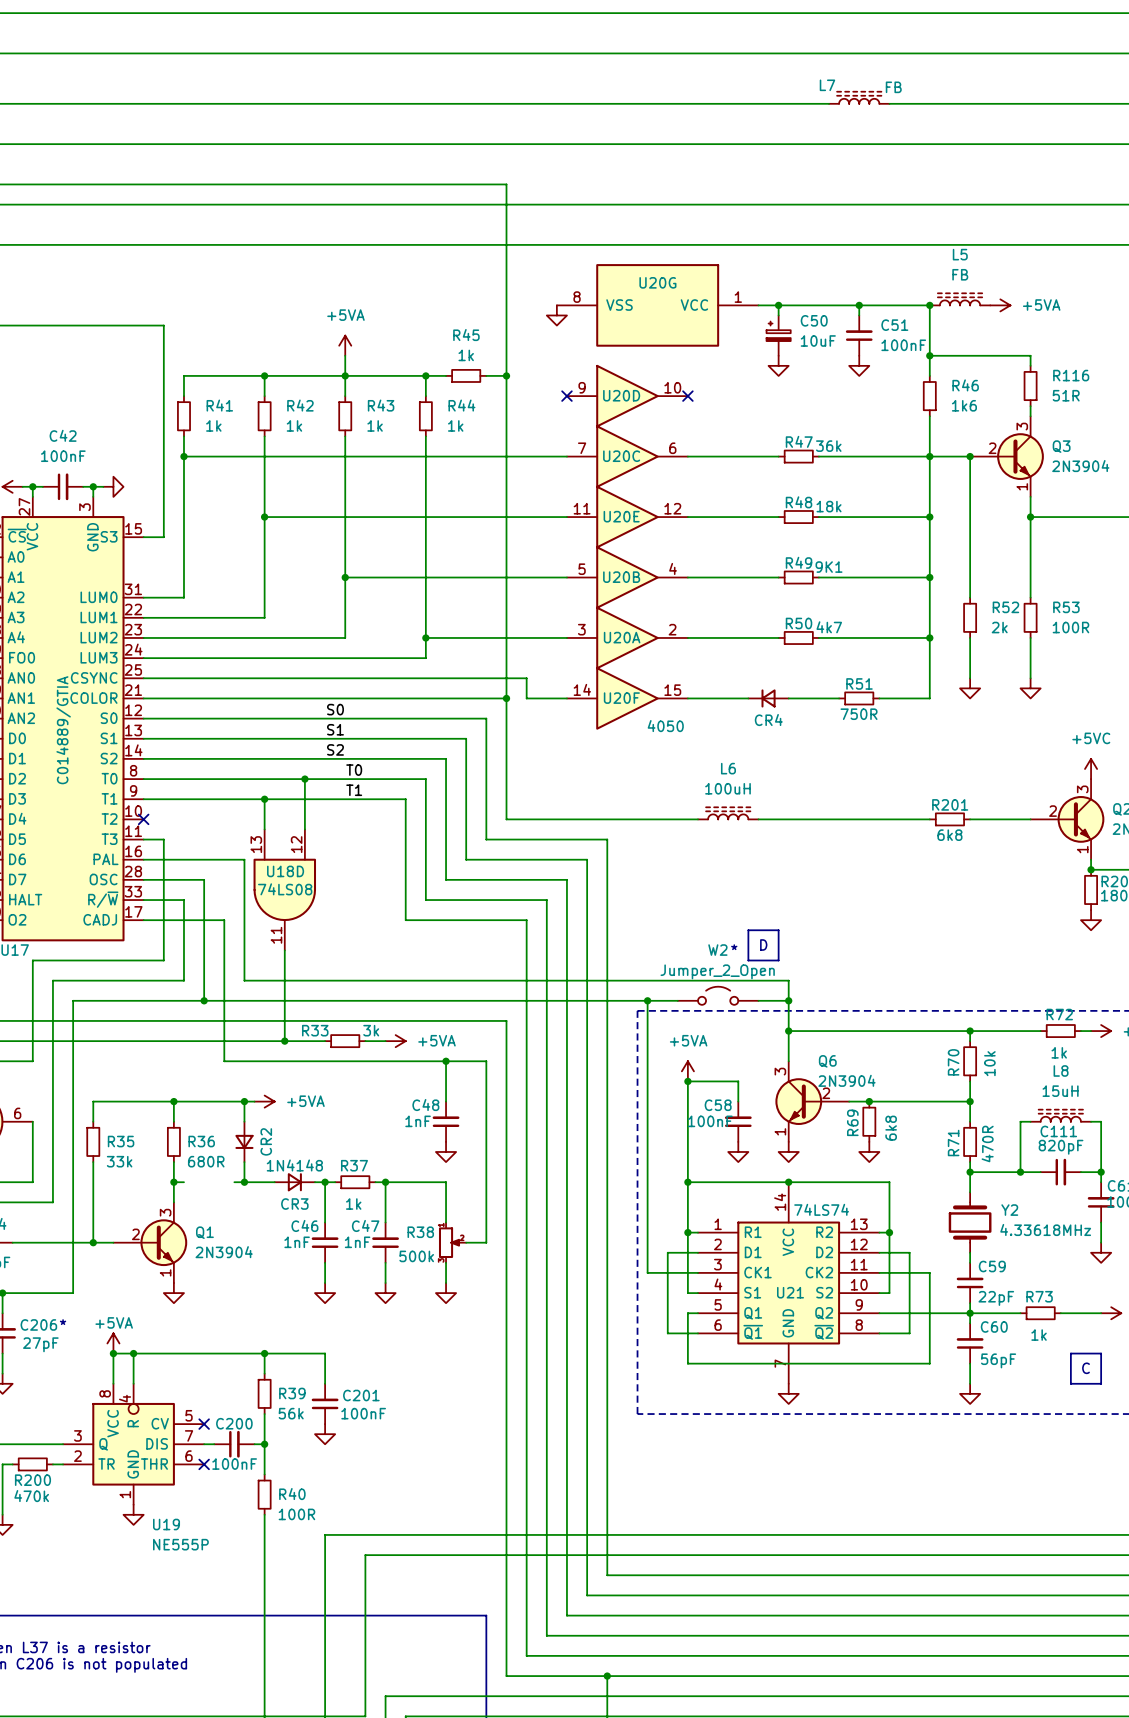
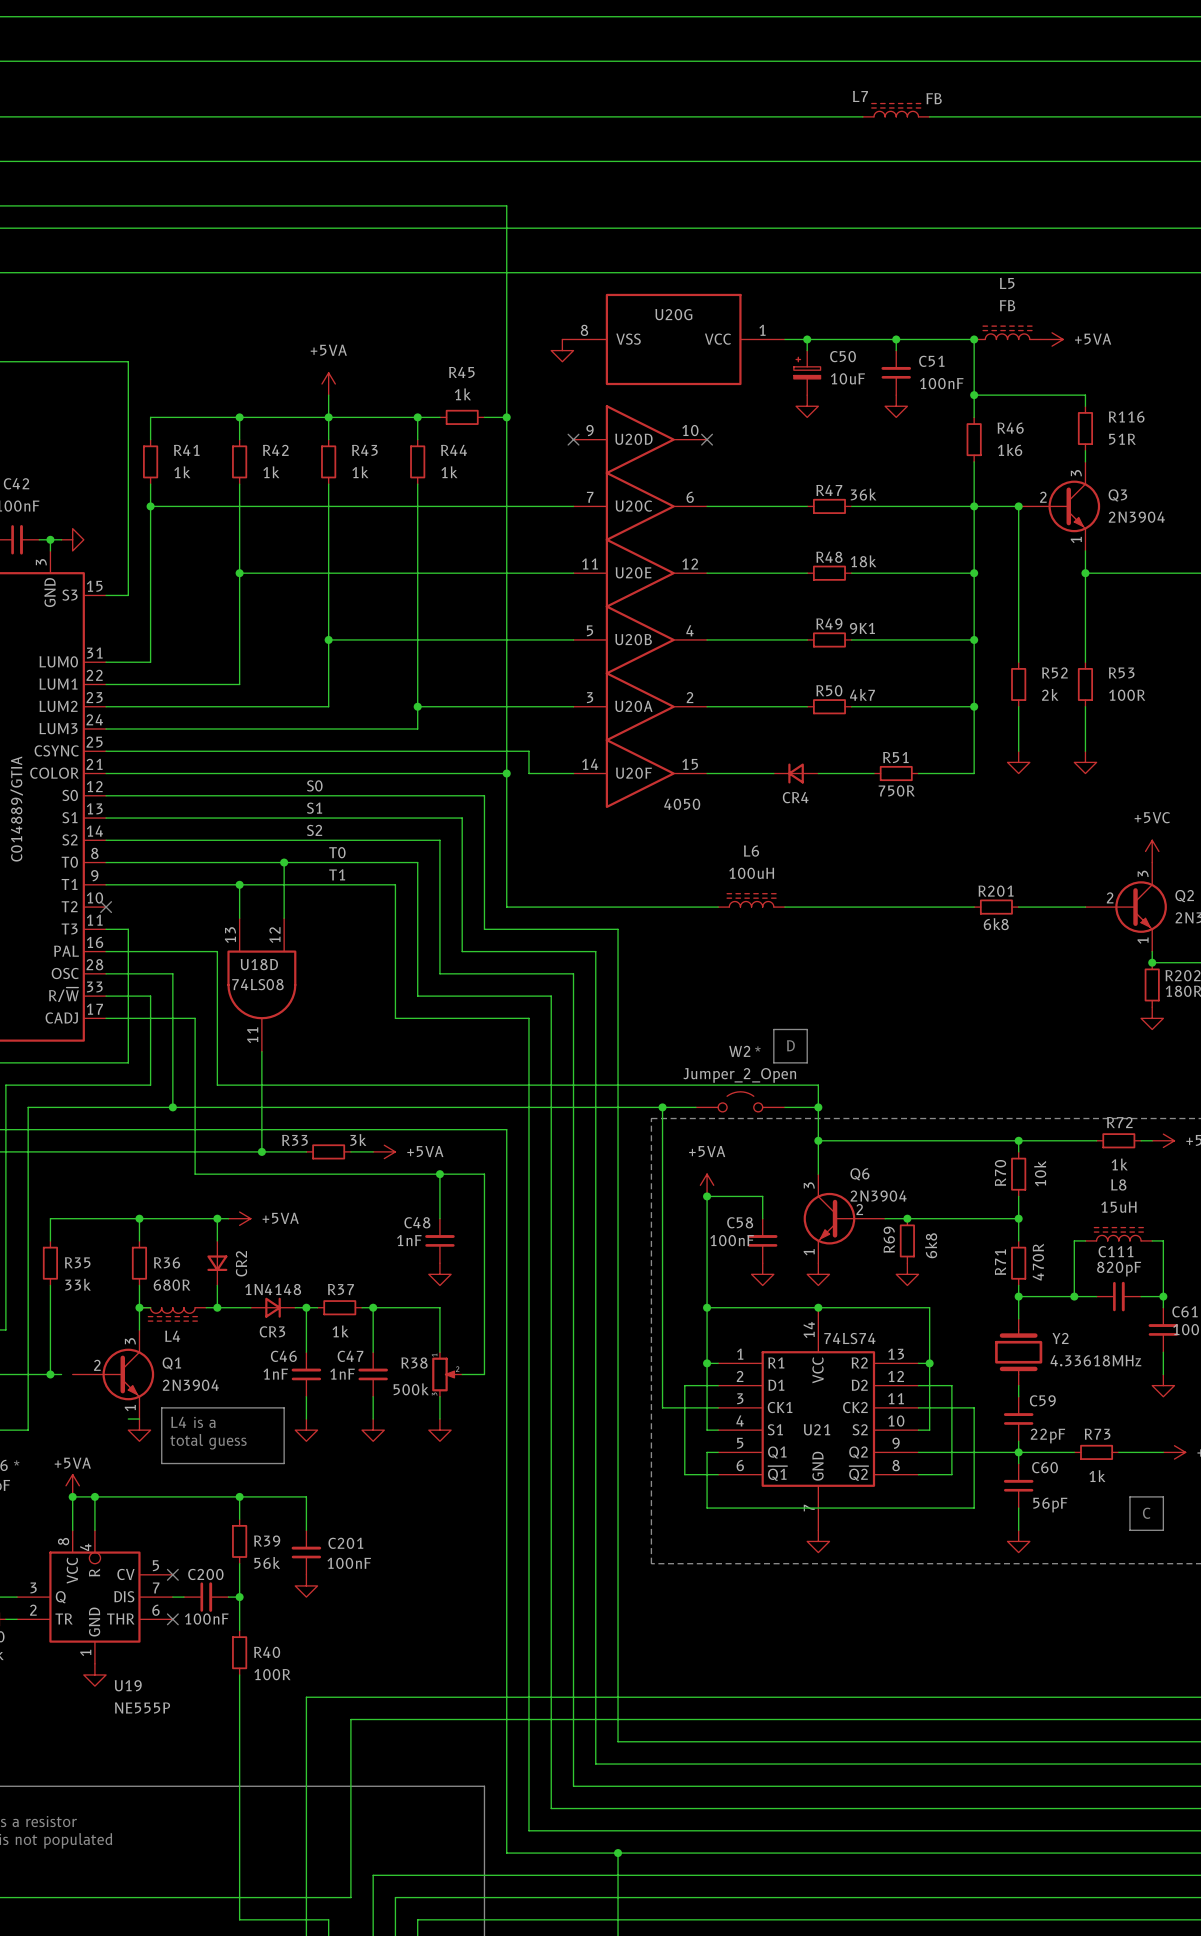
L4: none -> (172, 1314)
wire: (103, 1242) (113, 1242) -> (128, 1419) (139, 1419)
line: none -> (161, 1407) (284, 1407) (284, 1463) (161, 1463) (161, 1407)
text: none -> L4 is a (193, 1422)
text: none -> total guess (208, 1441)

